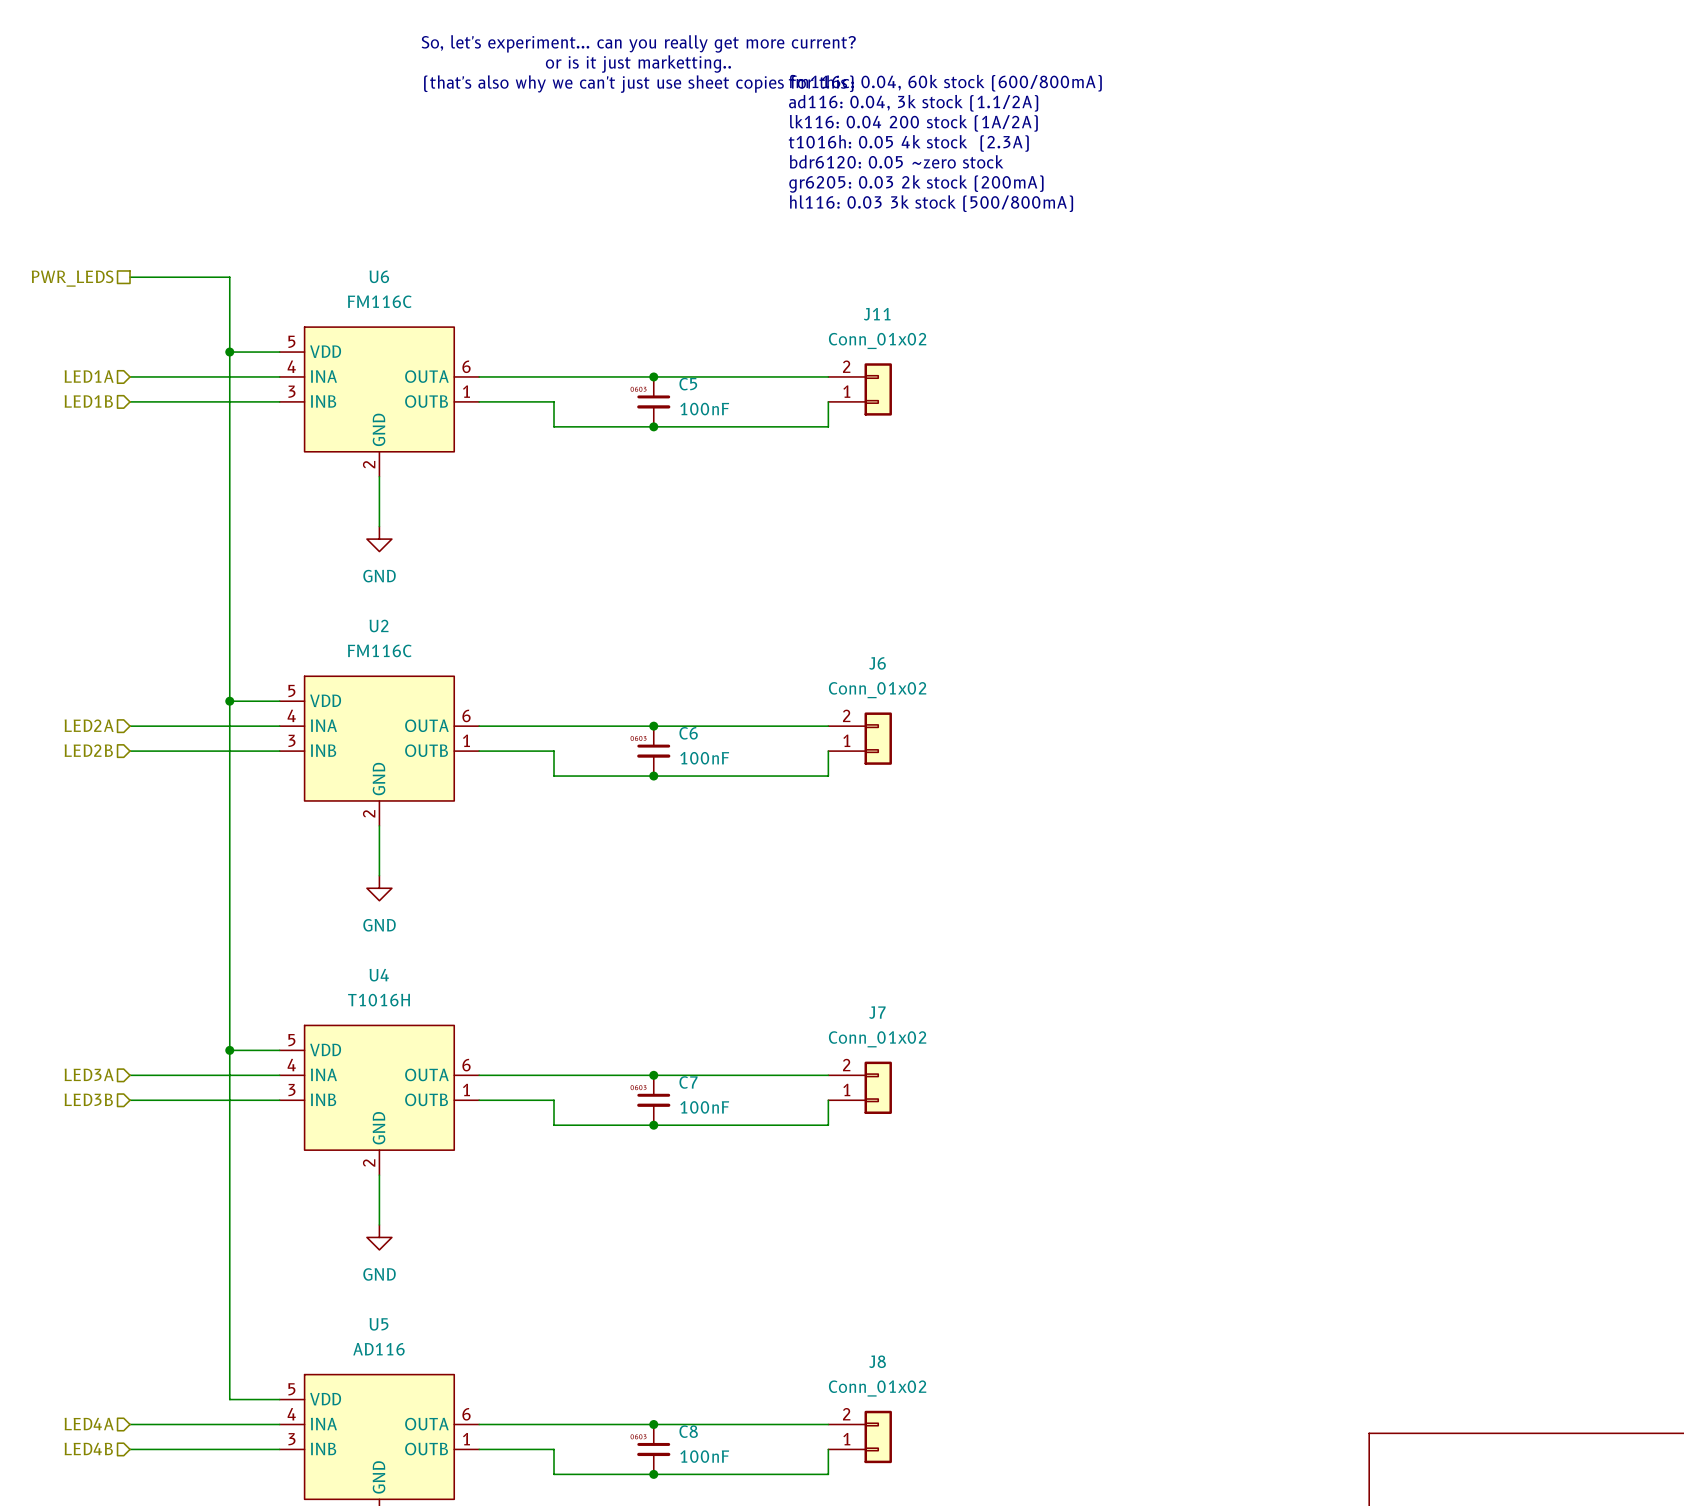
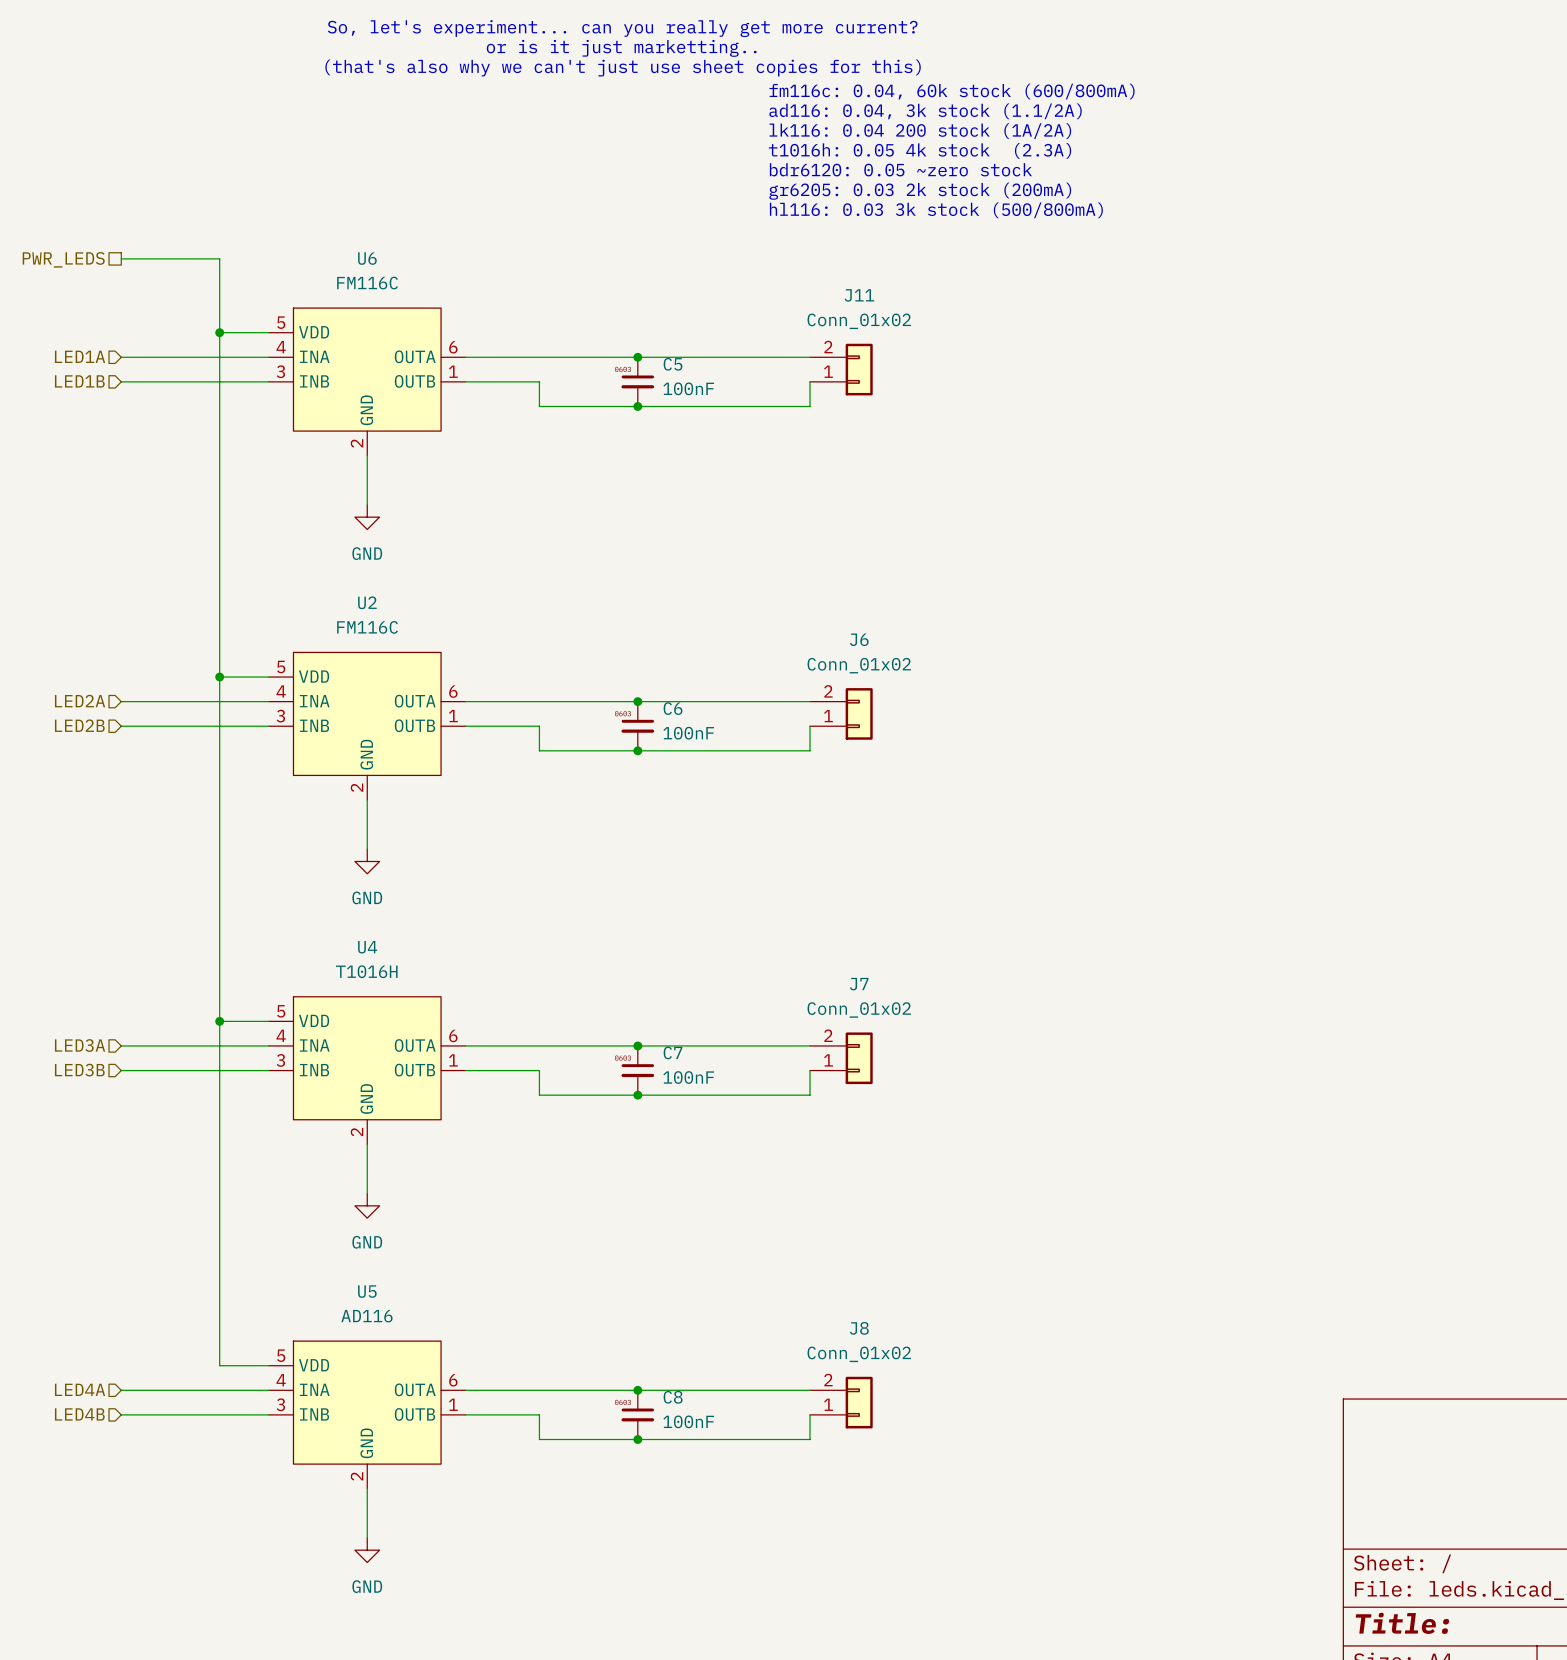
text: fm116c: 0.04, 60k stock (600/800mA) (945, 83) -> none
text: ad116: 0.04, 3k stock (1.1/2A) (913, 103) -> fm116c: 0.04, 60k stock (600/800mA) (952, 91)
text: lk116: 0.04 200 stock (1A/2A) (913, 123) -> ad116: 0.04, 3k stock (1.1/2A) (925, 111)
text: t1016h: 0.05 4k stock (2.3A) (908, 143) -> lk116: 0.04 200 stock (1A/2A) (920, 131)
text: bdr6120: 0.05 ~zero stock (896, 161) -> t1016h: 0.05 4k stock (2.3A) (920, 150)
text: gr6205: 0.03 2k stock (200mA) (916, 183) -> bdr6120: 0.05 ~zero stock (900, 169)
text: hl116: 0.03 3k stock (500/800mA) (931, 203) -> gr6205: 0.03 2k stock (200mA) (920, 191)
text: none -> hl116: 0.03 3k stock (500/800mA) (936, 210)

